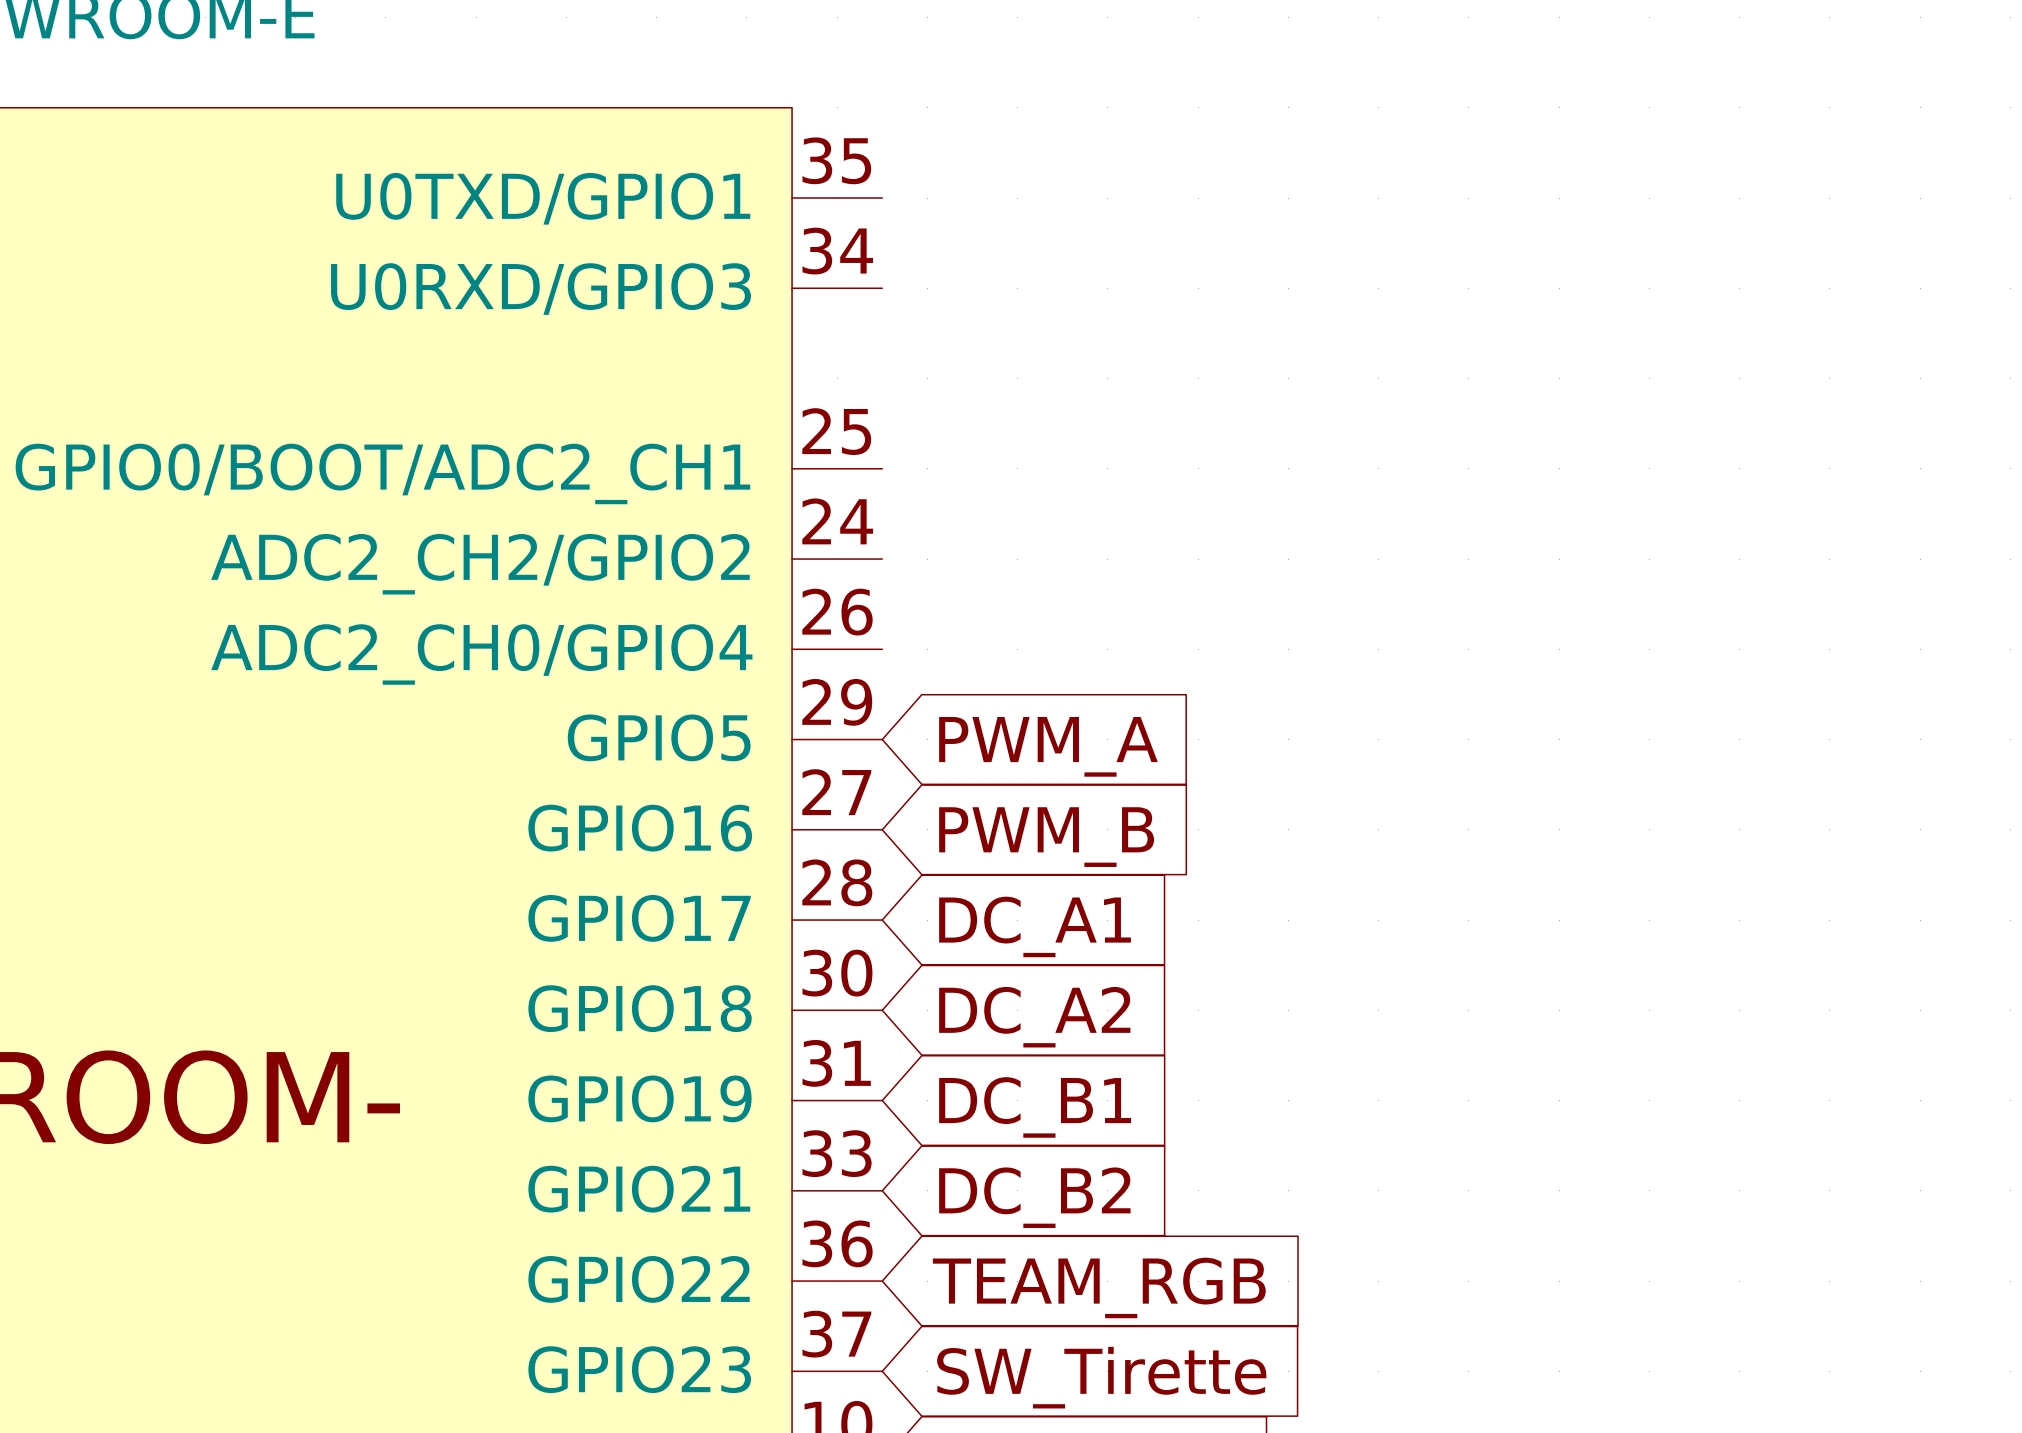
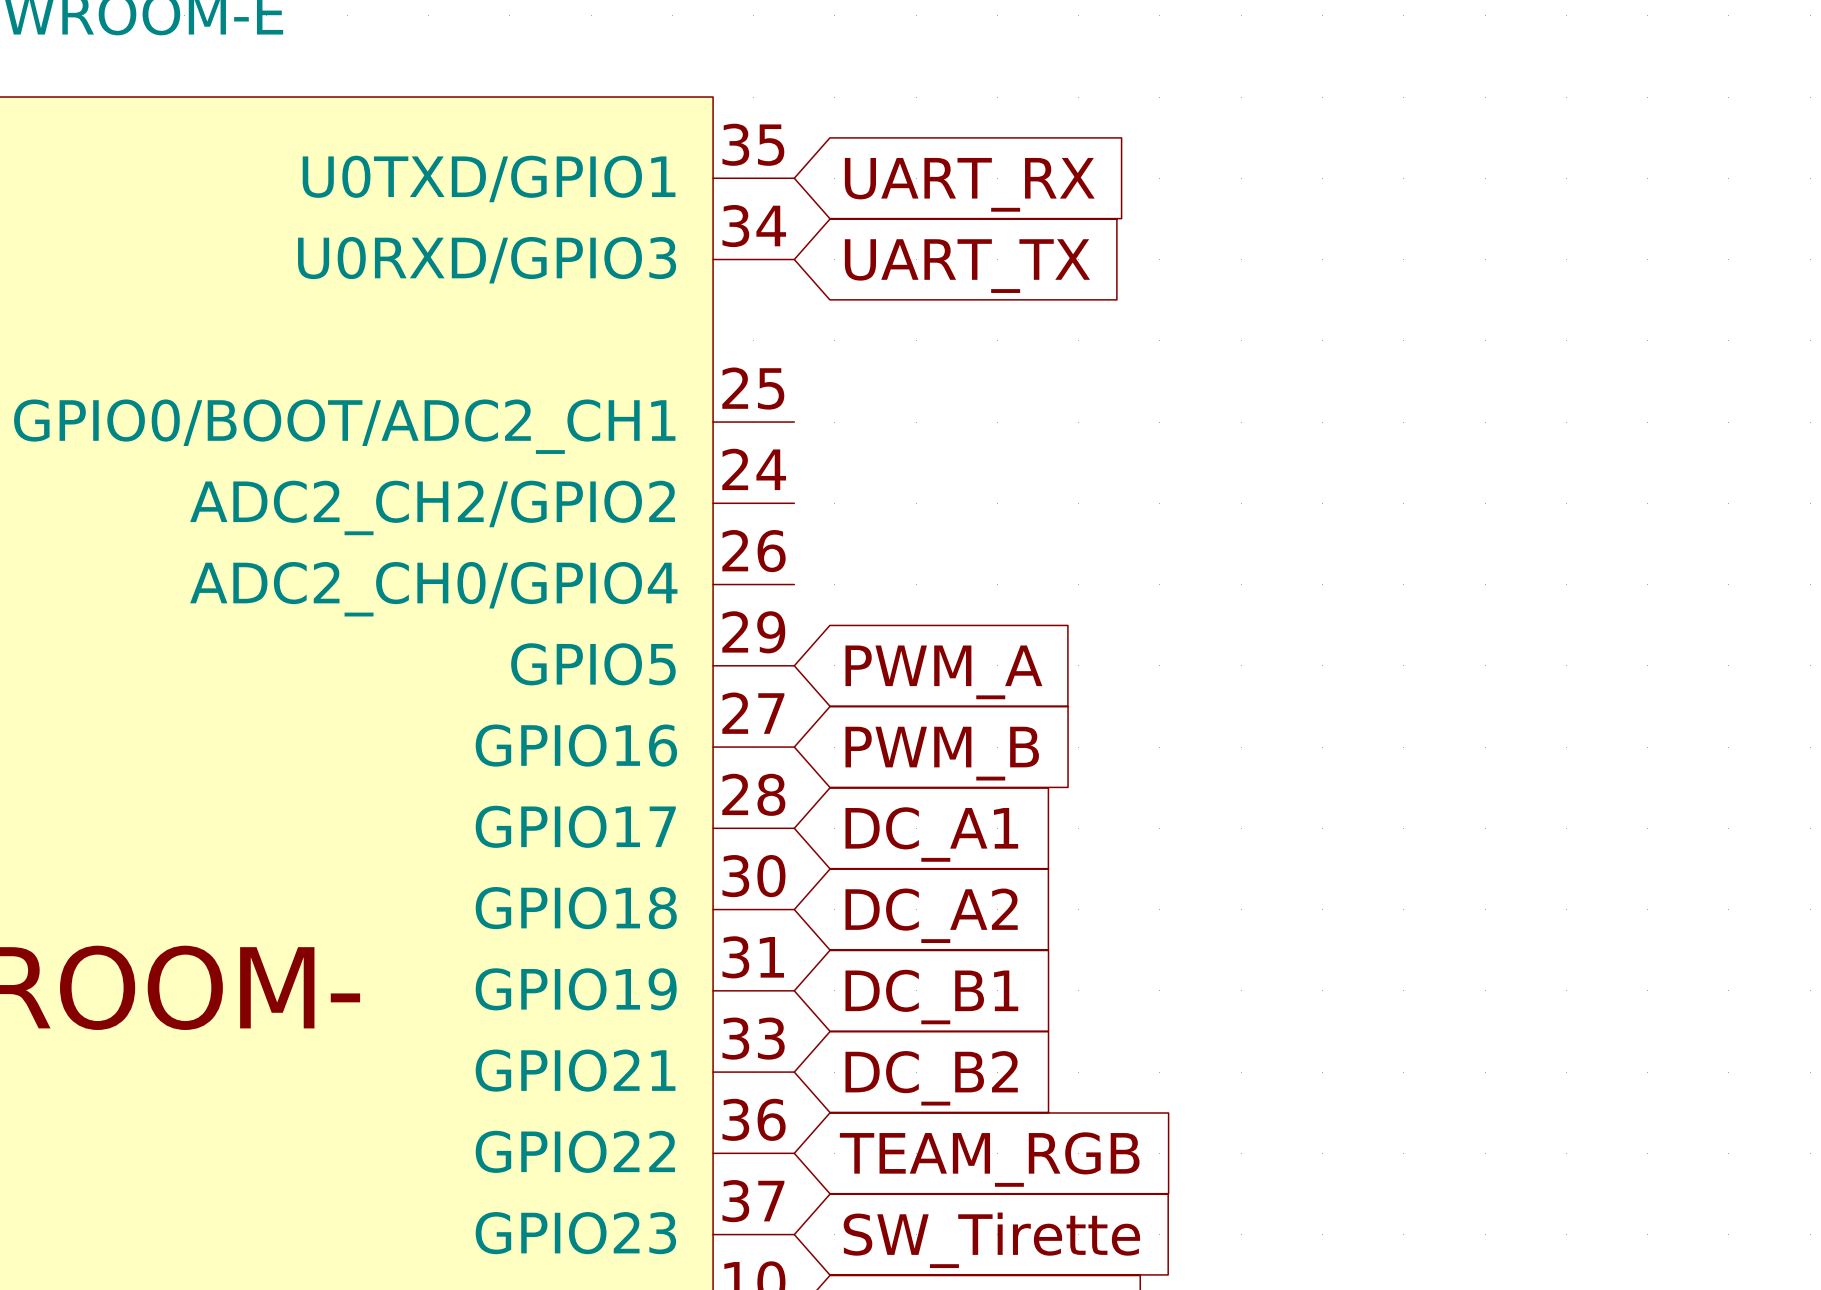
global label: none -> UART_RX (969, 184)
global label: none -> UART_TX (967, 266)

